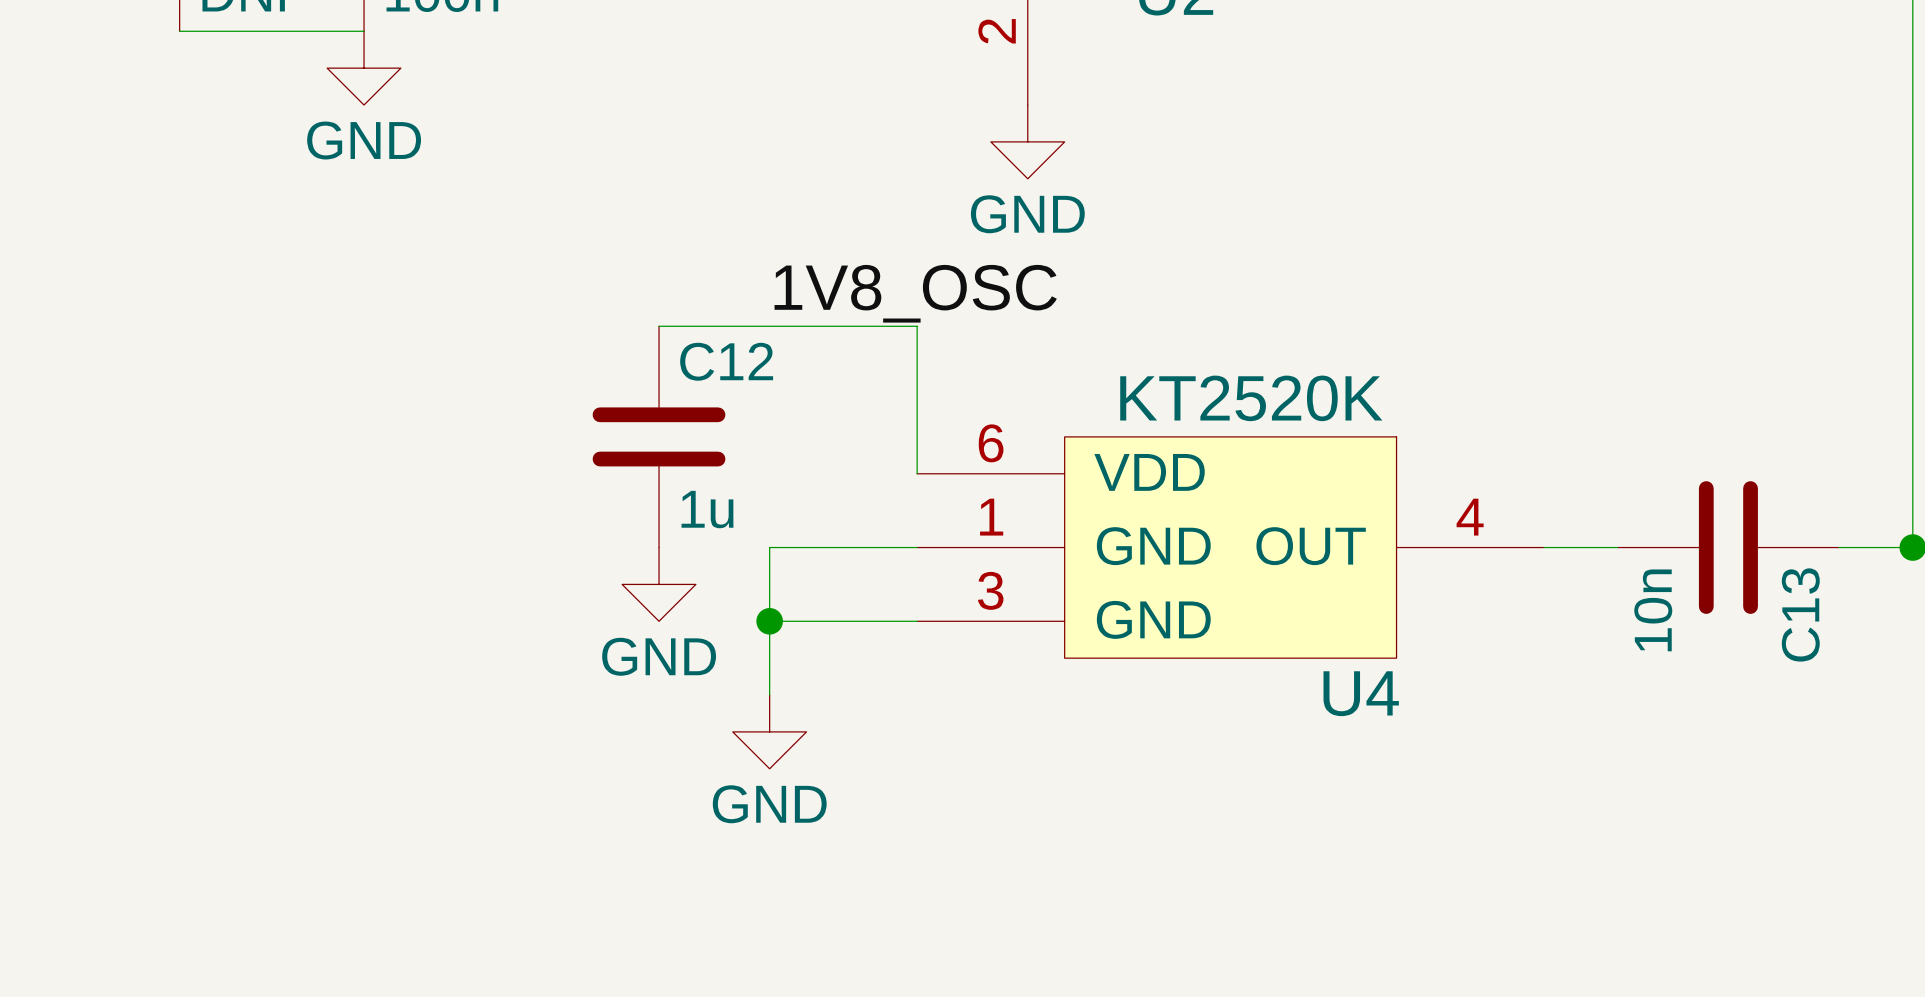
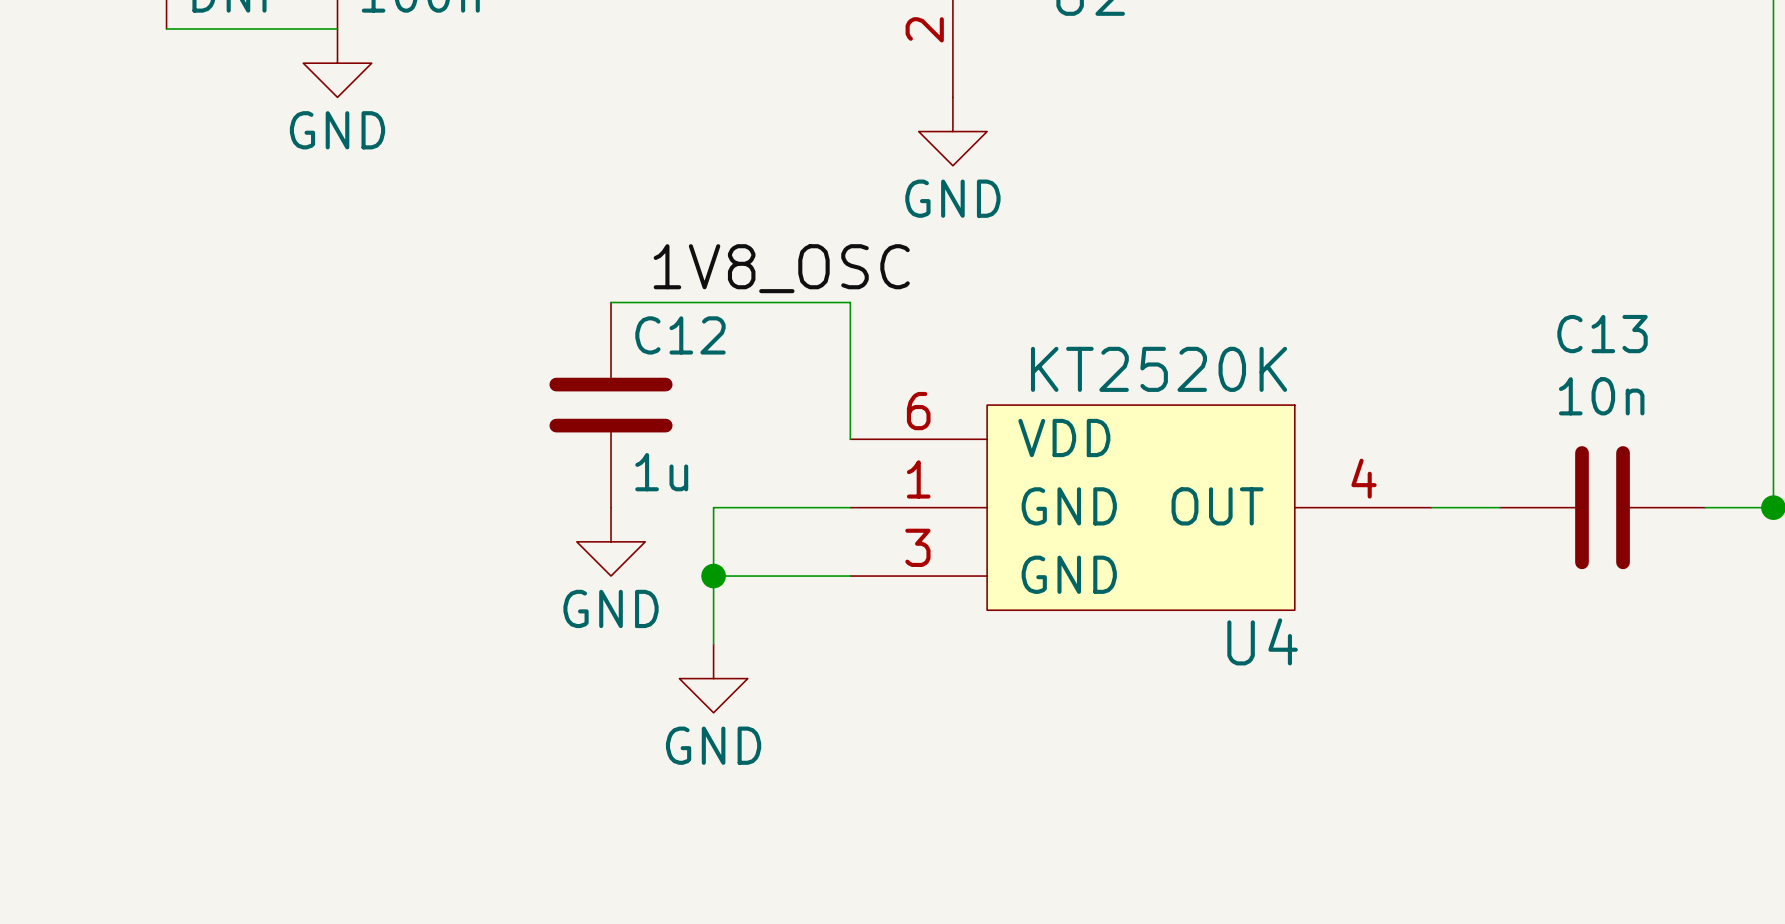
label position: 1V8_OSC (915, 293) -> 1V8_OSC (781, 268)
C13 value rotation: 0° (1653, 610) -> 90° clockwise (1601, 396)
C13 value position: 10n (1653, 610) -> 10n (1601, 396)
C13 name rotation: 0° (1800, 614) -> 90° clockwise (1602, 334)
C13 name position: C13 (1800, 614) -> C13 (1602, 334)

